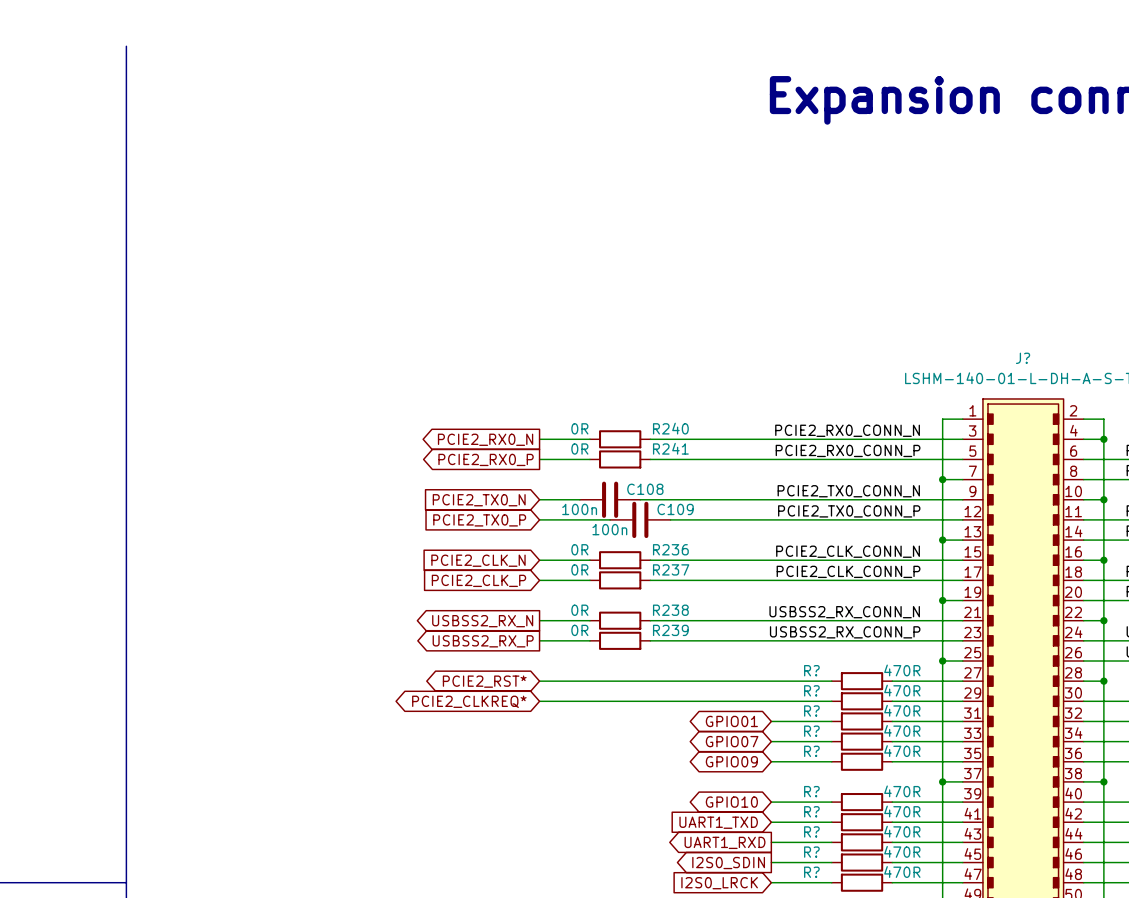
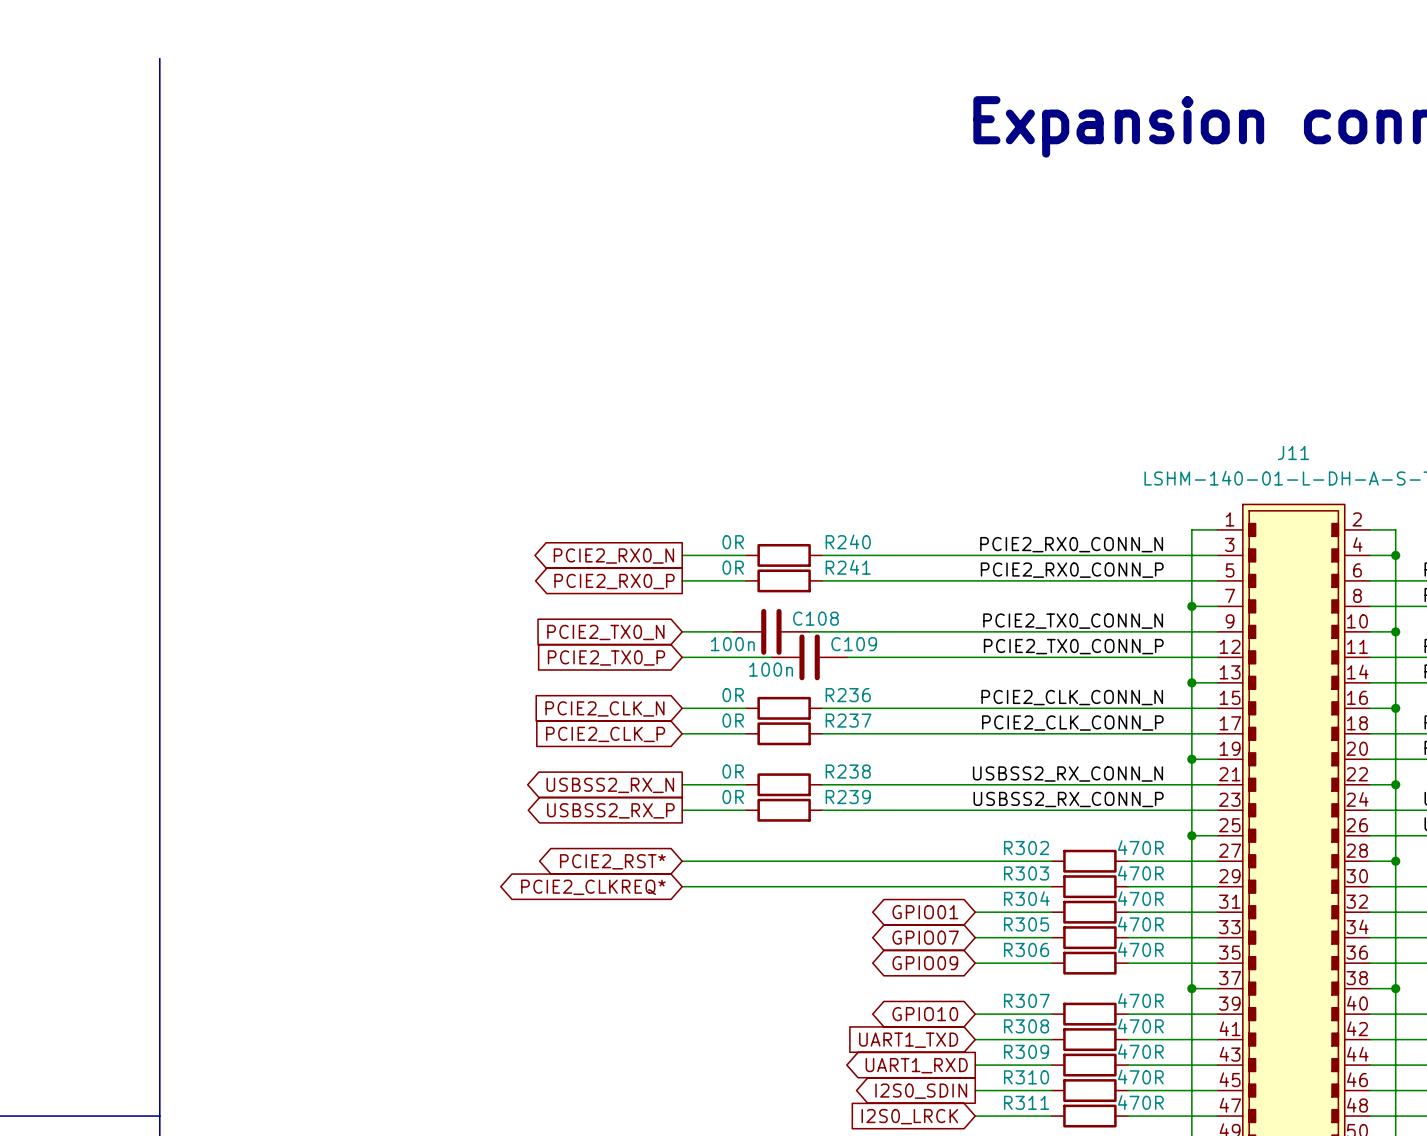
J? name: J? (1023, 358) -> J11 (1293, 453)
R? name: R? (811, 670) -> R302 (1026, 848)
R? name: R? (811, 690) -> R303 (1026, 873)
R? name: R? (811, 711) -> R304 (1026, 898)
R? name: R? (811, 731) -> R305 (1026, 924)
R? name: R? (811, 751) -> R306 (1026, 949)
R? name: R? (811, 791) -> R307 (1026, 1000)
R? name: R? (811, 811) -> R308 (1026, 1026)
R? name: R? (811, 831) -> R309 (1026, 1051)
R? name: R? (811, 852) -> R310 (1026, 1077)
R? name: R? (811, 872) -> R311 (1026, 1102)

